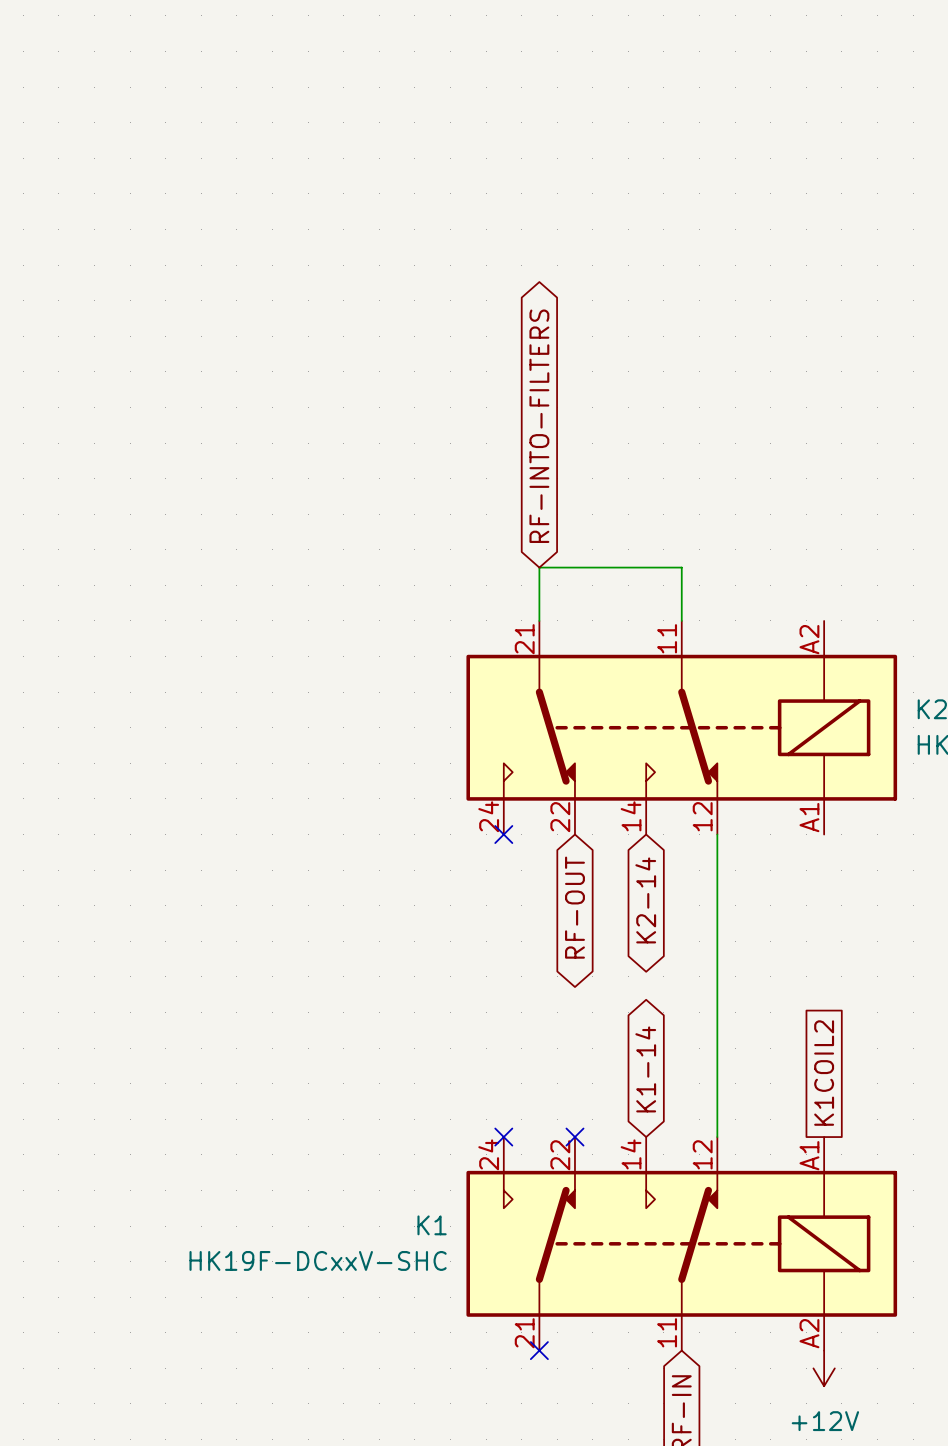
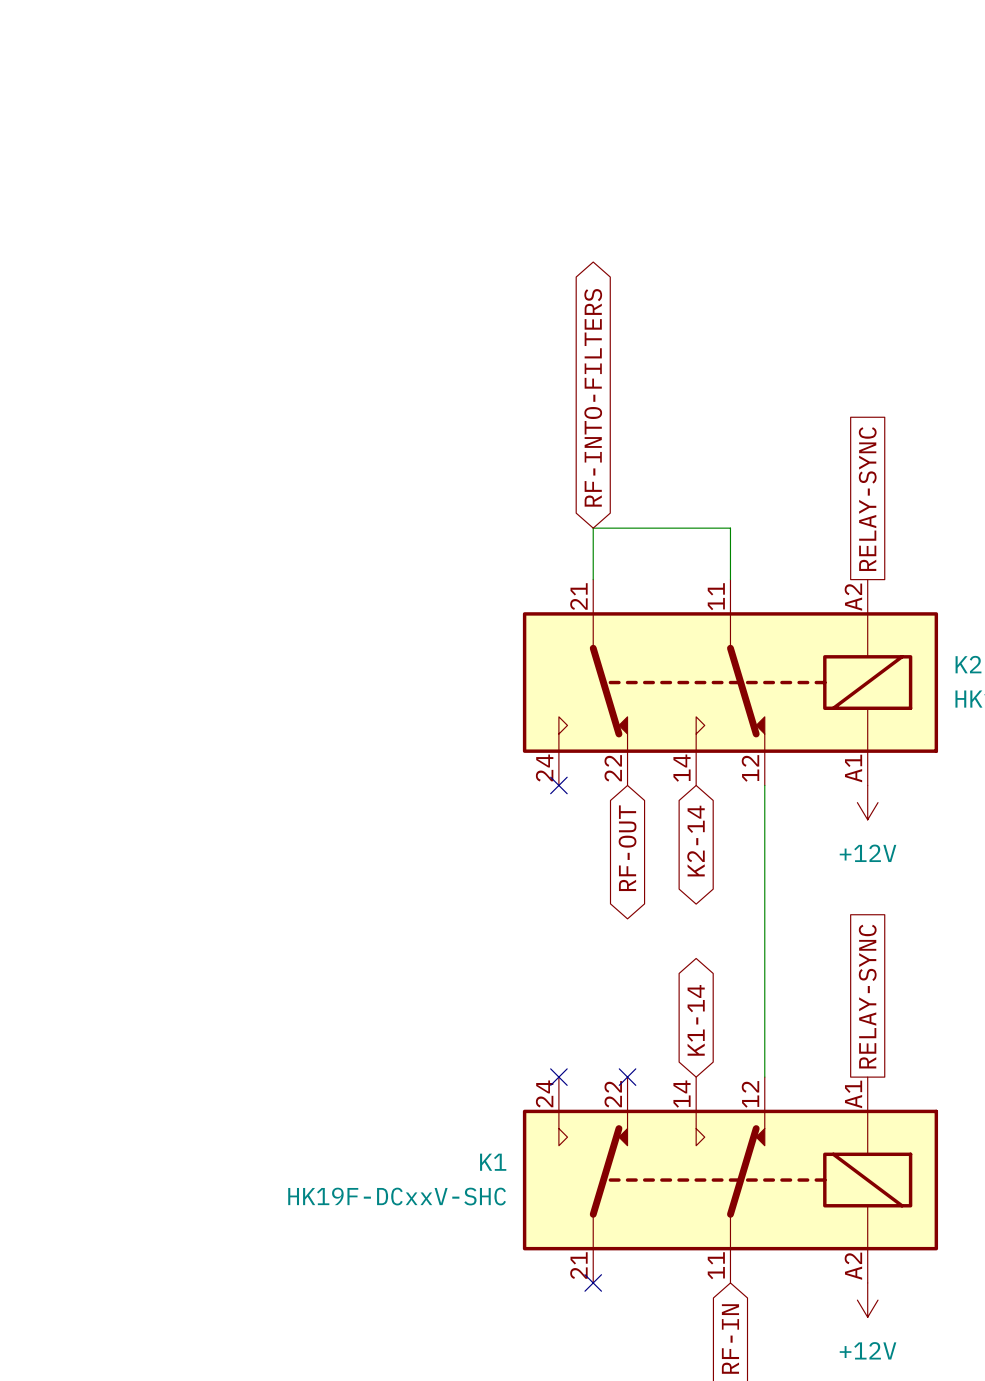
global label: none -> RELAY-SYNC (867, 499)
power symbol: none -> +12V (867, 802)
global label: K1COIL2 (824, 1073) -> RELAY-SYNC (867, 996)

